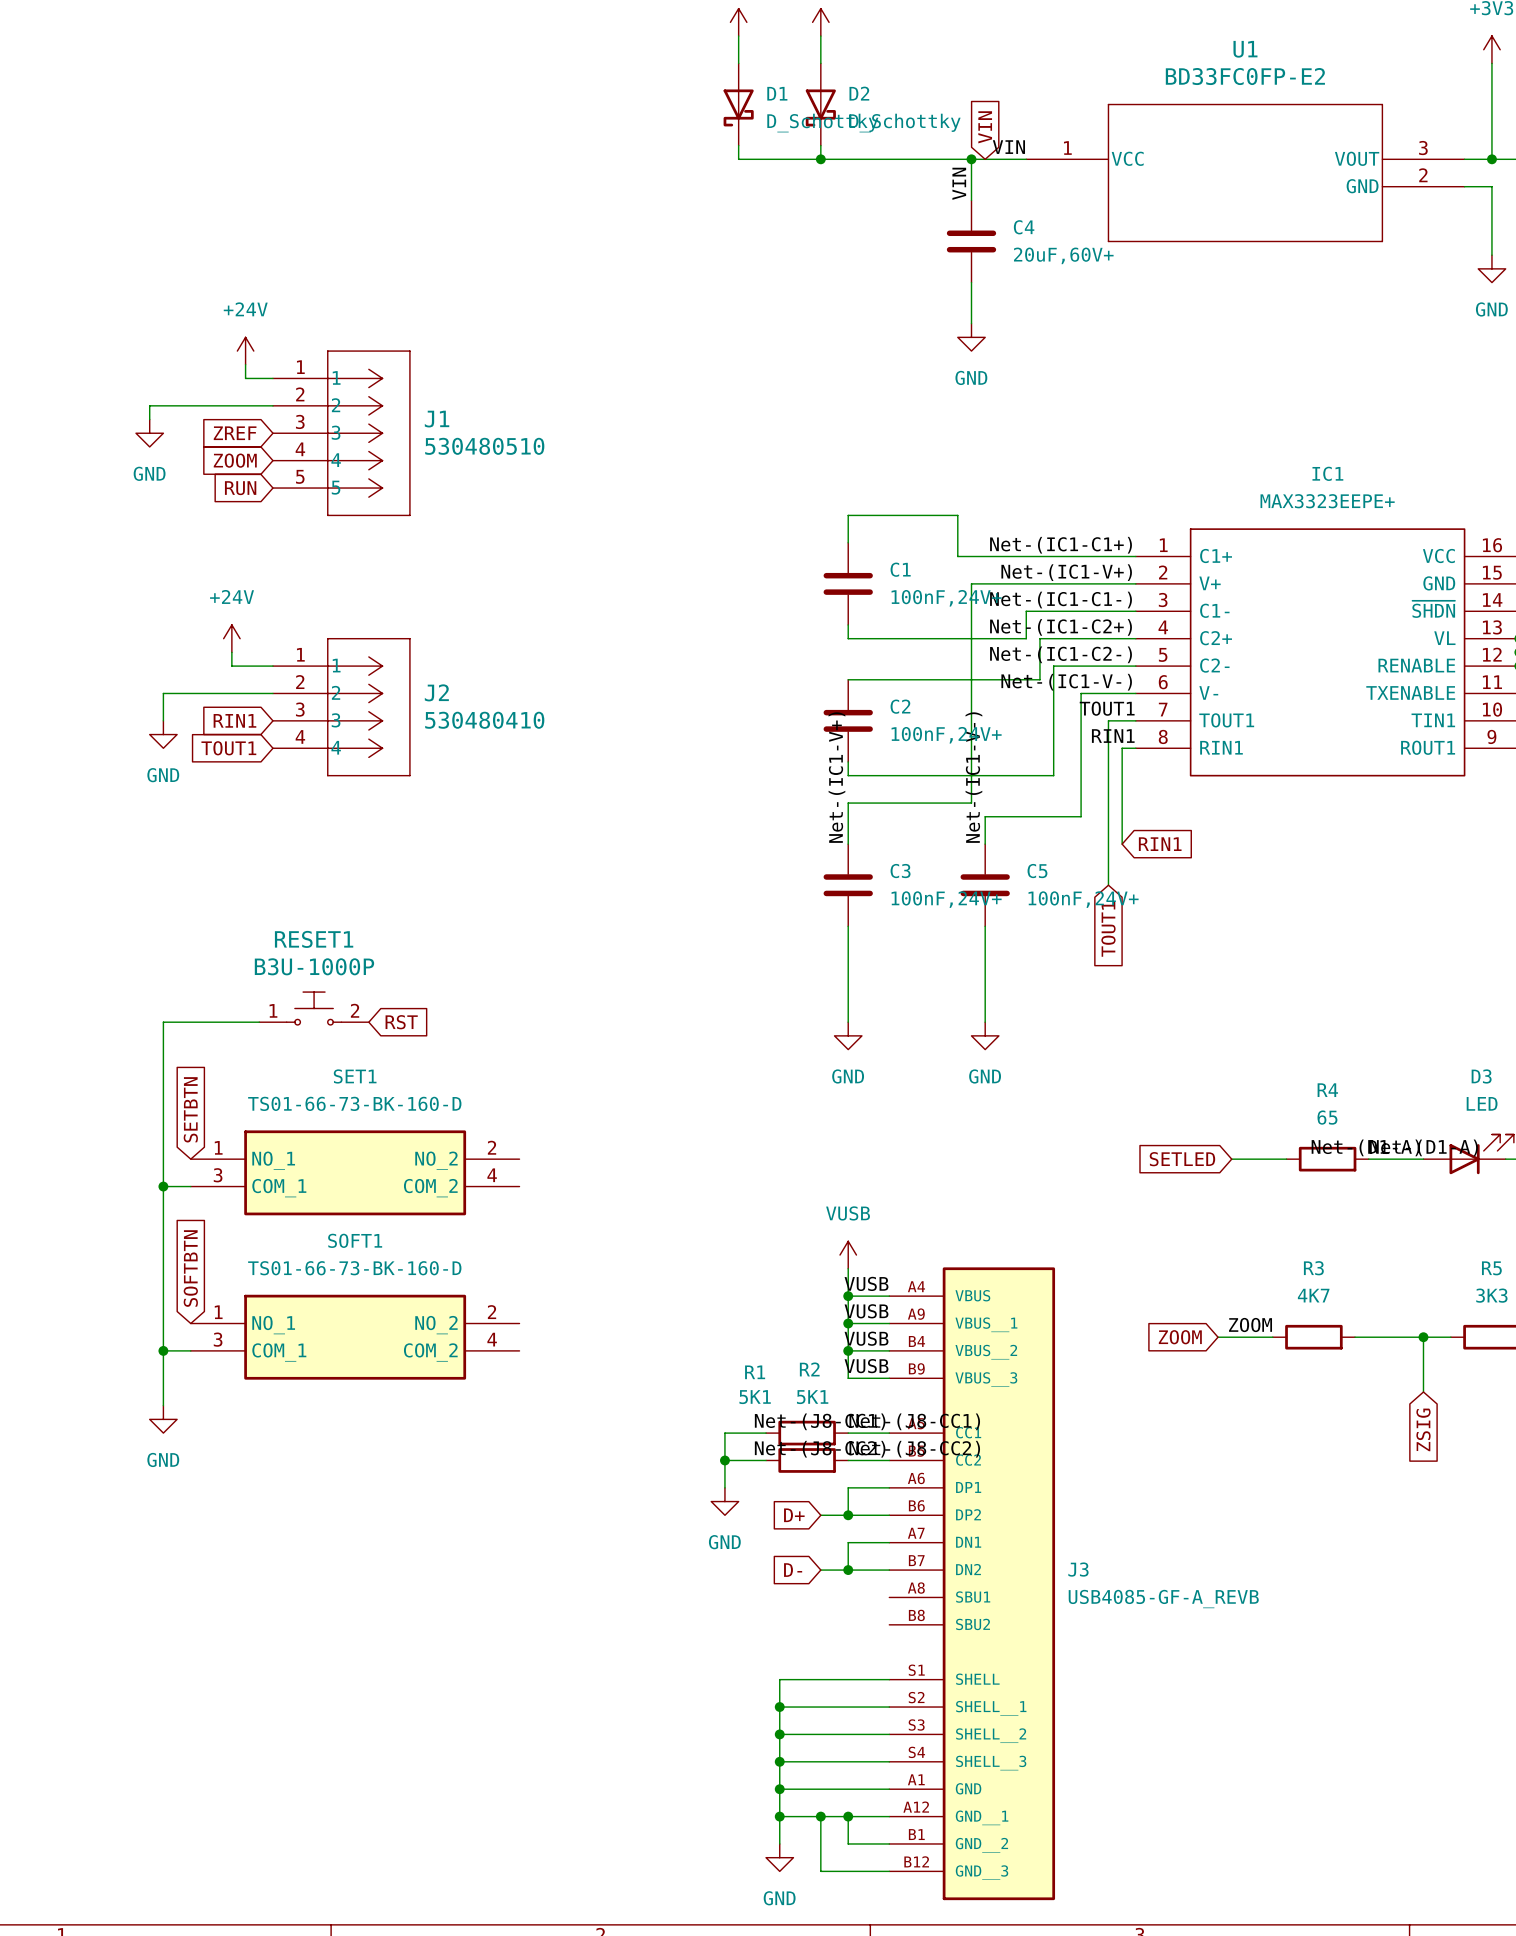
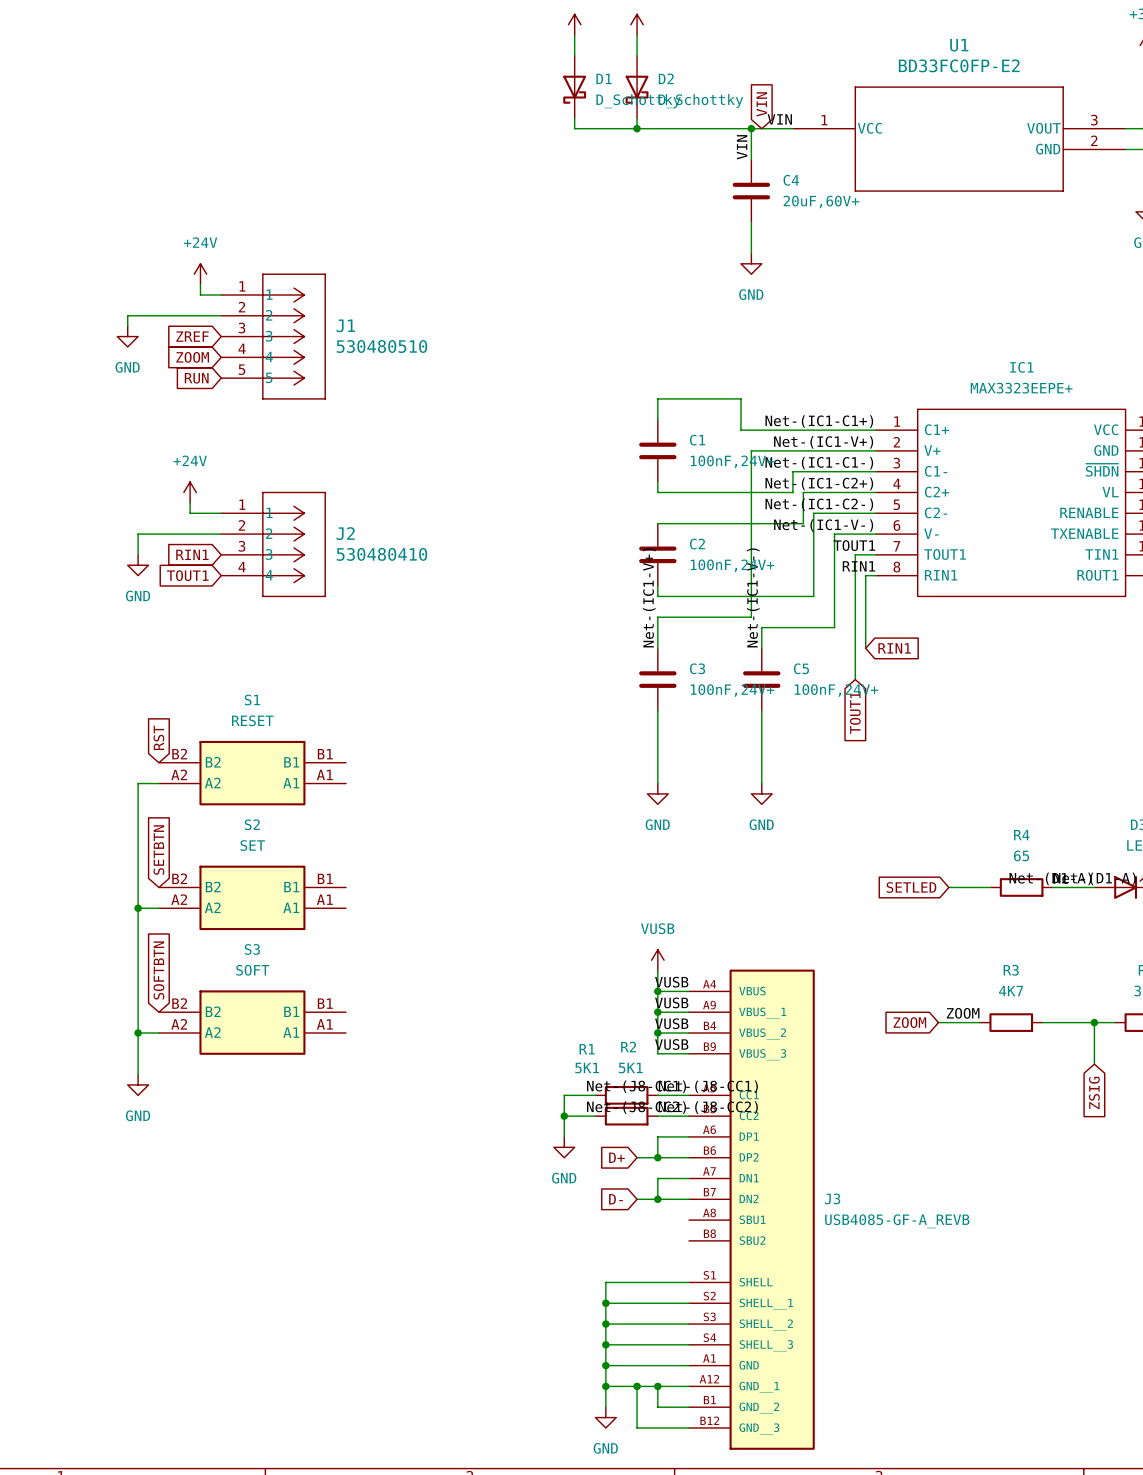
RESET1: B3U-1000P (314, 1008) -> none
S1: none -> RESET (252, 773)
global label rotation: 0° (401, 1022) -> 90° counterclockwise (158, 737)
global label position: RST (401, 1022) -> RST (158, 737)
S2: none -> SET (252, 897)
SET1: TS01-66-73-BK-160-D (355, 1172) -> none
S3: none -> SOFT (252, 1022)
SOFT1: TS01-66-73-BK-160-D (355, 1337) -> none

